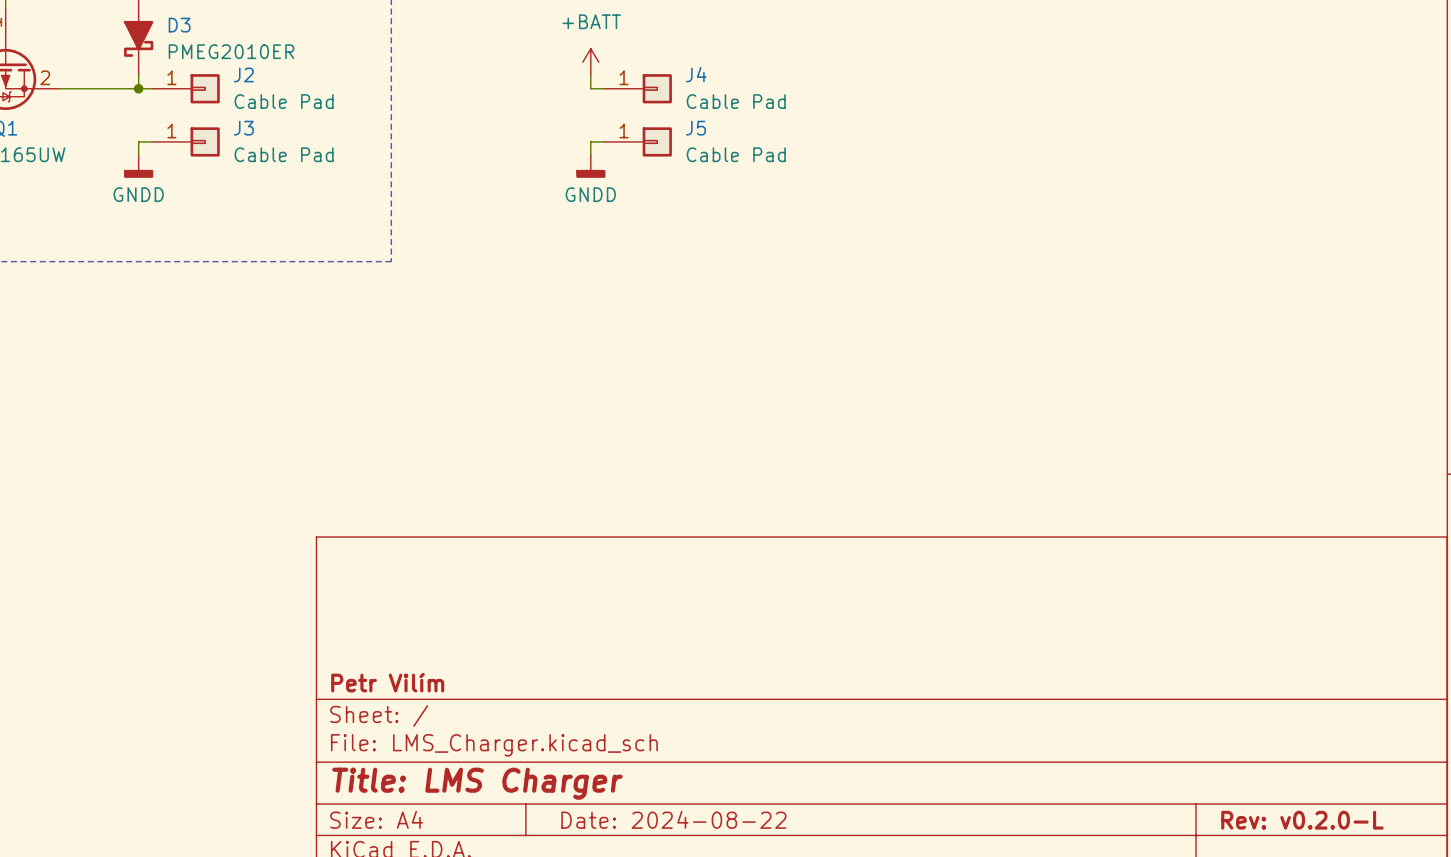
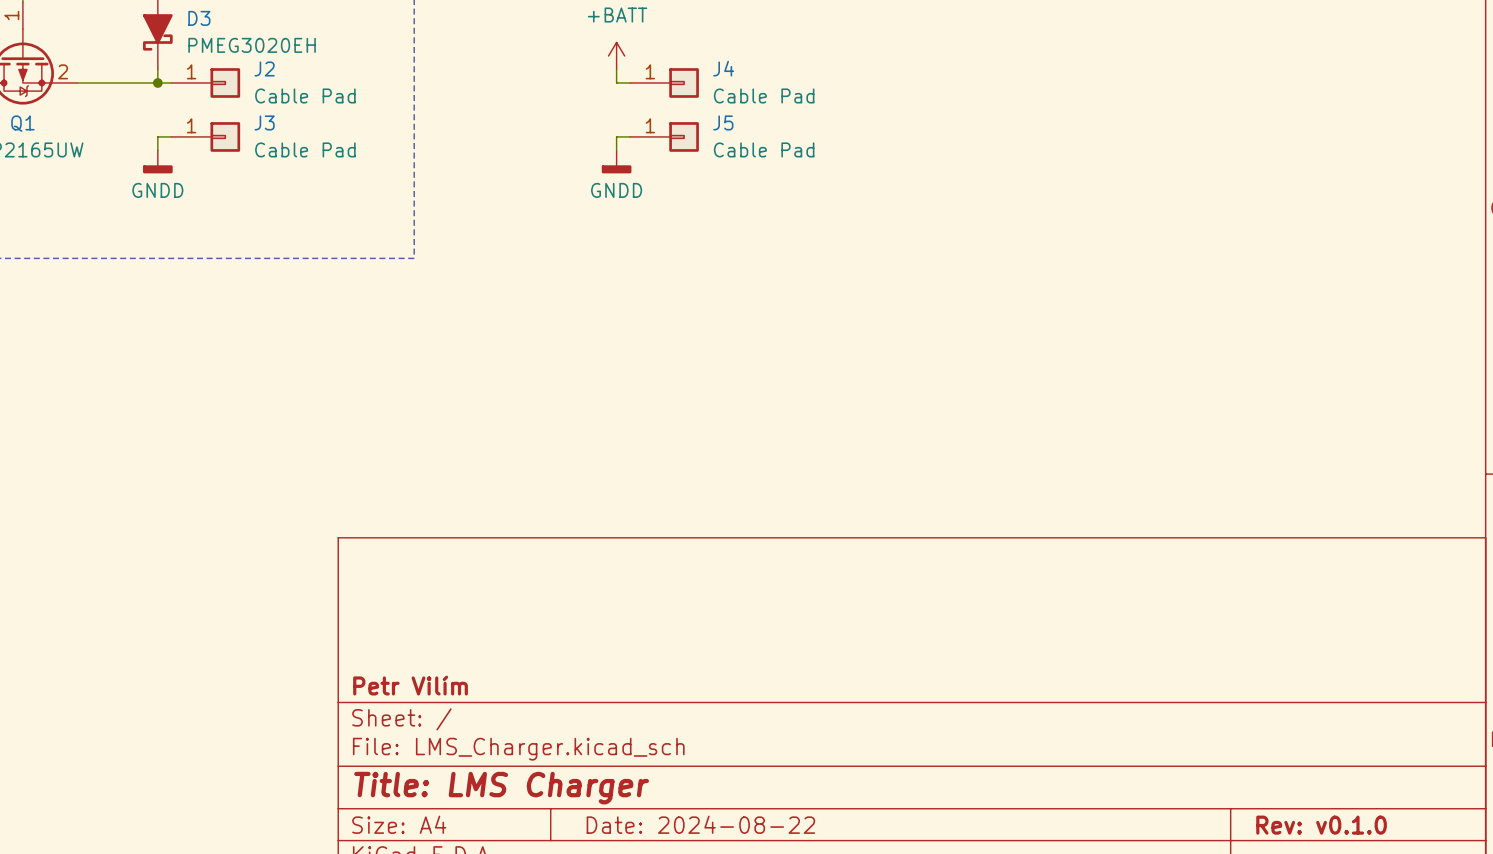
D3 value: PMEG2010ER (231, 51) -> PMEG3020EH (252, 45)
title block: Rev: v0.2.0-L (1302, 820) -> Rev: v0.1.0 (1321, 825)

